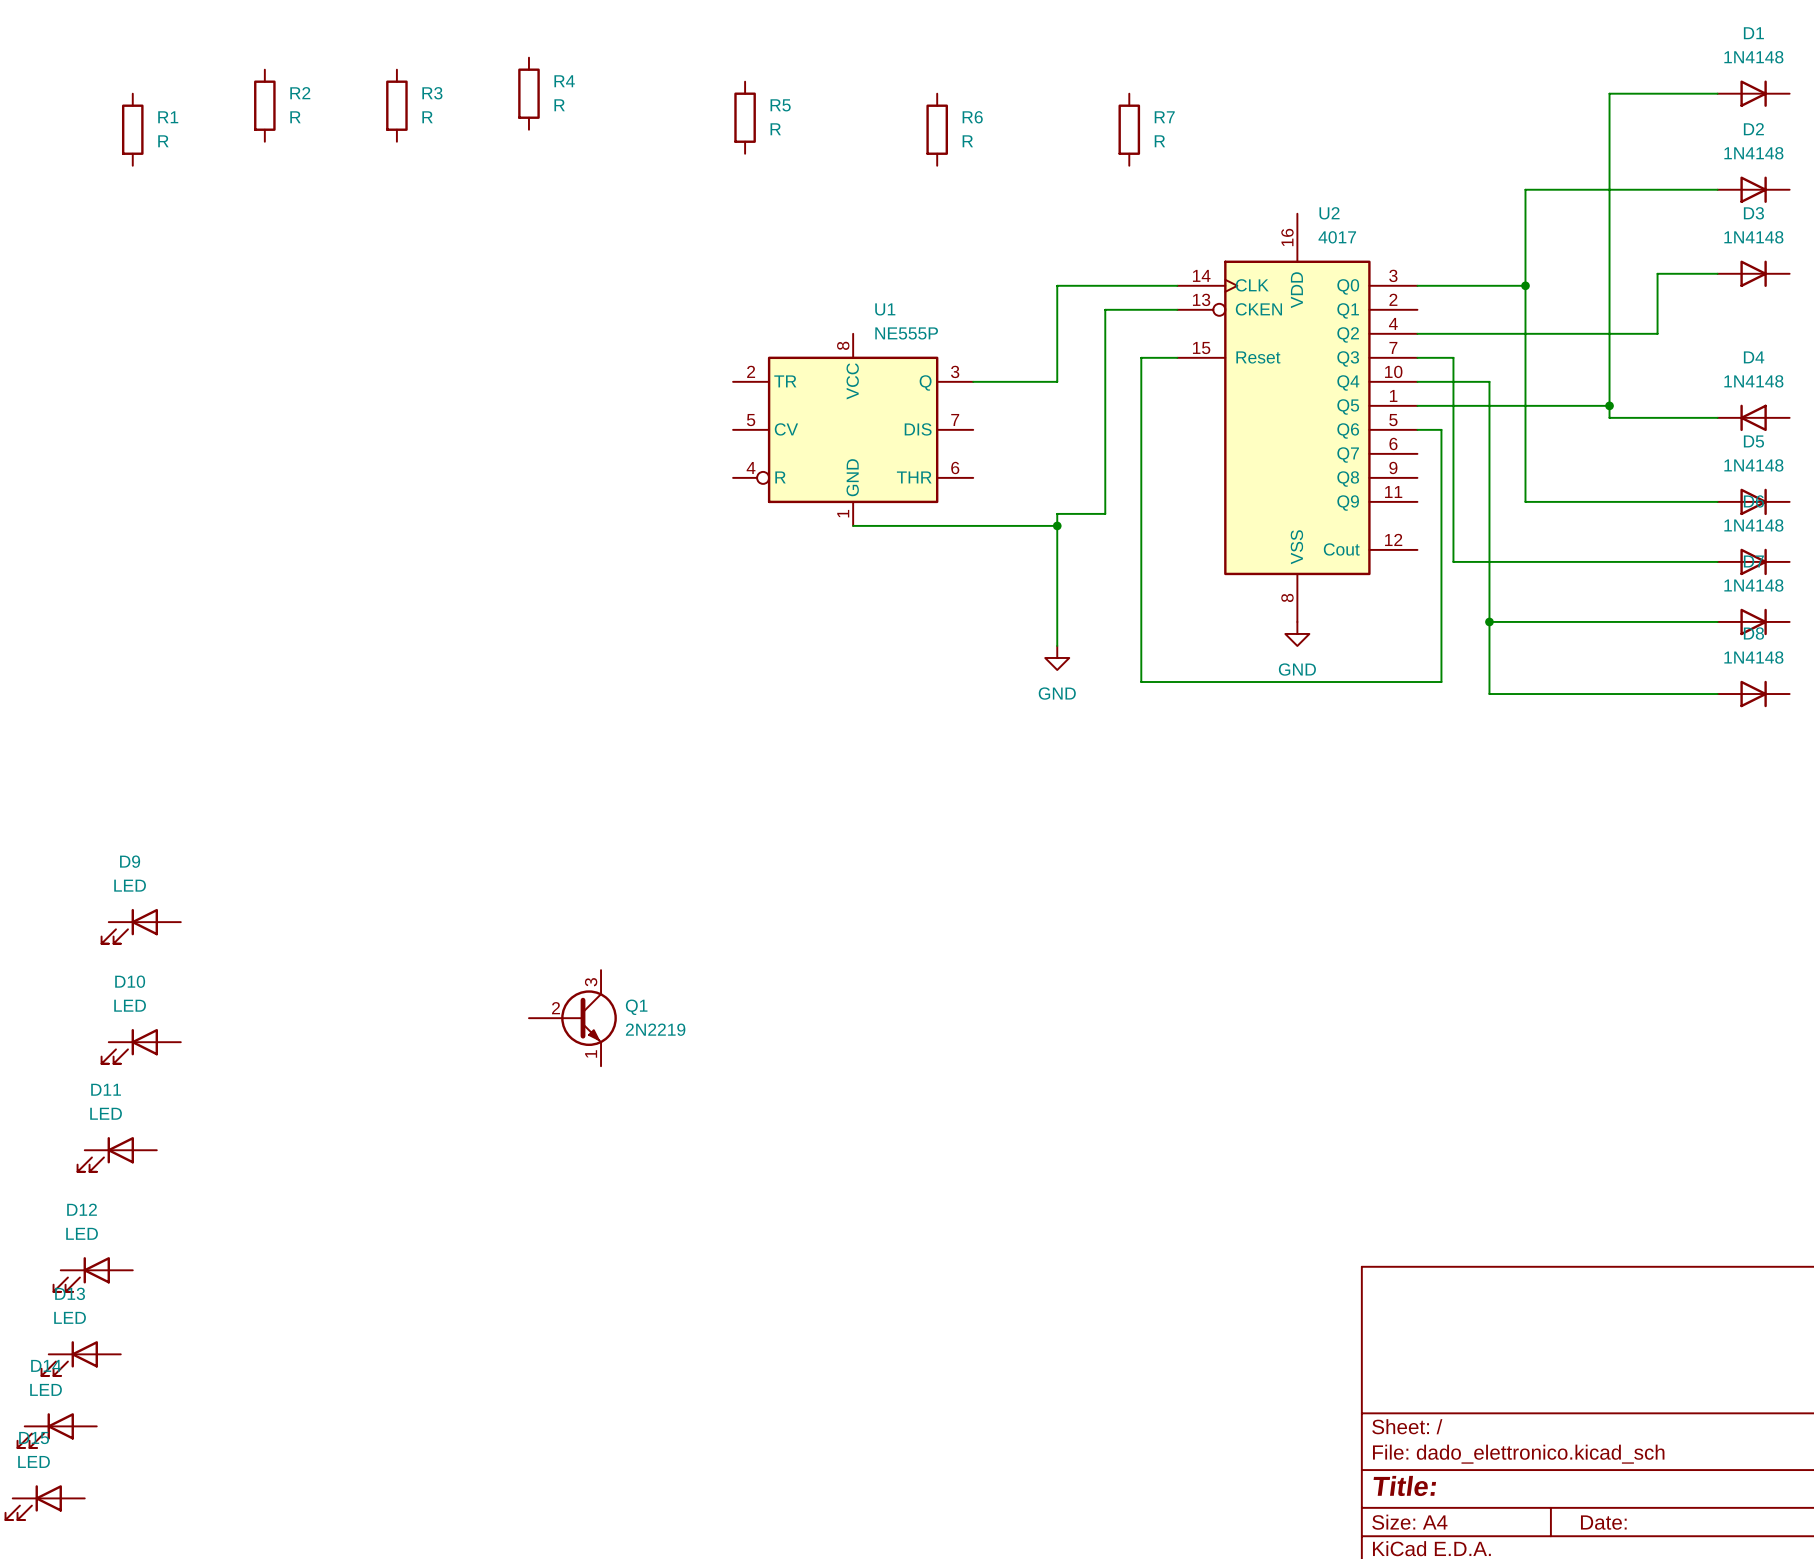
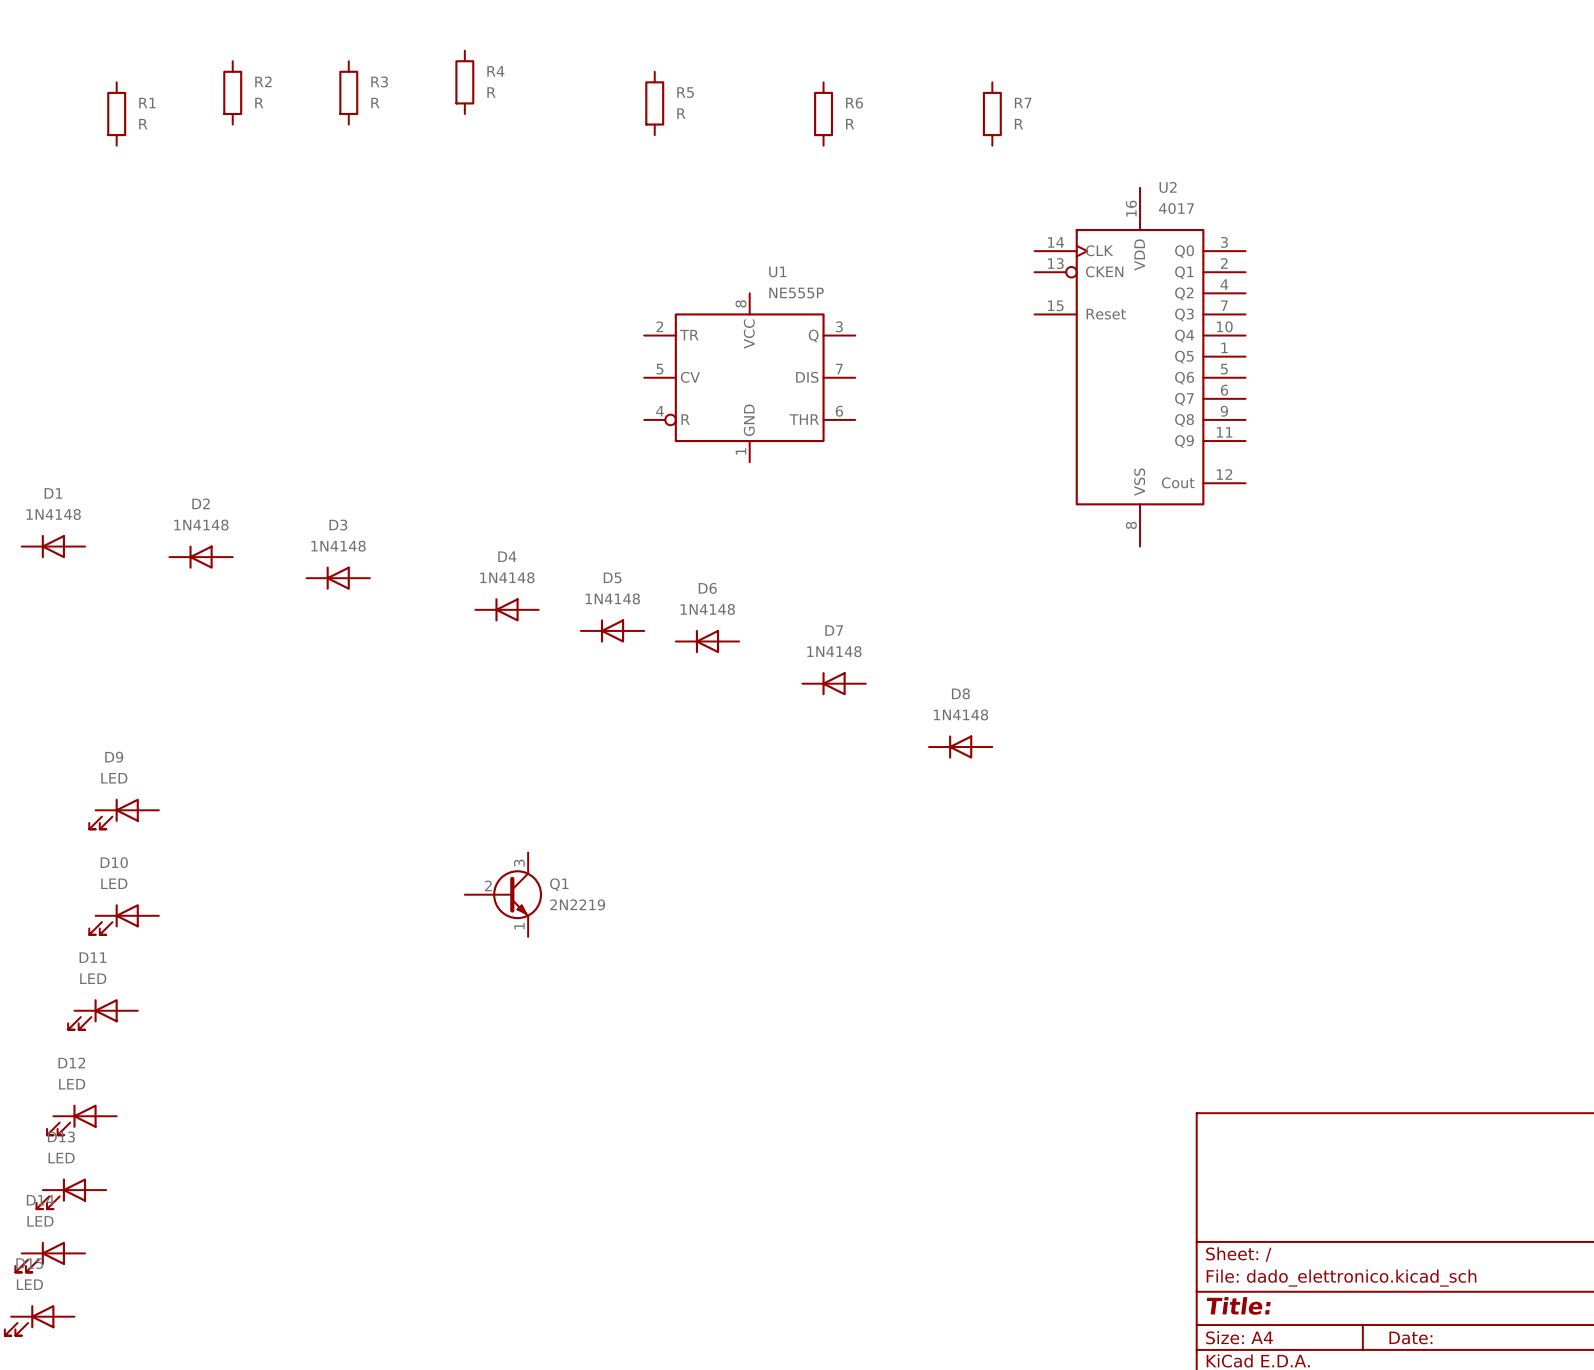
wire: (1717, 93) (1609, 93) (1609, 417) (1717, 417) -> none
D1 rotation: 0° (1753, 93) -> 180° (53, 546)
D1 position: (1753, 93) -> (53, 546)
wire: (1717, 189) (1525, 189) (1525, 501) (1717, 501) -> none
D2 rotation: 0° (1753, 189) -> 180° (201, 557)
D2 position: (1753, 189) -> (201, 557)
wire: (1717, 273) (1657, 273) (1657, 333) (1417, 333) -> none
D3 rotation: 0° (1753, 273) -> 180° (338, 578)
D3 position: (1753, 273) -> (338, 578)
wire: (1177, 285) (1057, 285) (1057, 381) (973, 381) -> none
wire: (1417, 285) (1525, 285) -> none
junction: (1525, 285) -> none
wire: (1177, 309) (1105, 309) (1105, 513) (1057, 513) (1057, 645) -> none
wire: (1177, 357) (1141, 357) (1141, 682) (1441, 682) (1441, 429) (1417, 429) -> none
wire: (1417, 357) (1453, 357) (1453, 561) (1717, 561) -> none
wire: (1417, 381) (1489, 381) (1489, 694) (1717, 694) -> none
wire: (1417, 405) (1609, 405) -> none
junction: (1609, 405) -> none
D4 position: (1753, 417) -> (507, 609)
D5 rotation: 0° (1753, 501) -> 180° (612, 630)
D5 position: (1753, 501) -> (612, 630)
wire: (853, 525) (1057, 525) -> none
junction: (1057, 525) -> none
D6 rotation: 0° (1753, 561) -> 180° (707, 641)
D6 position: (1753, 561) -> (707, 641)
wire: (1489, 621) (1717, 621) -> none
junction: (1489, 621) -> none
D7 rotation: 0° (1753, 621) -> 180° (834, 683)
D7 position: (1753, 621) -> (834, 683)
power symbol: GND (1297, 633) -> none
power symbol: GND (1057, 657) -> none
D8 rotation: 0° (1753, 694) -> 180° (960, 747)
D8 position: (1753, 694) -> (960, 747)

